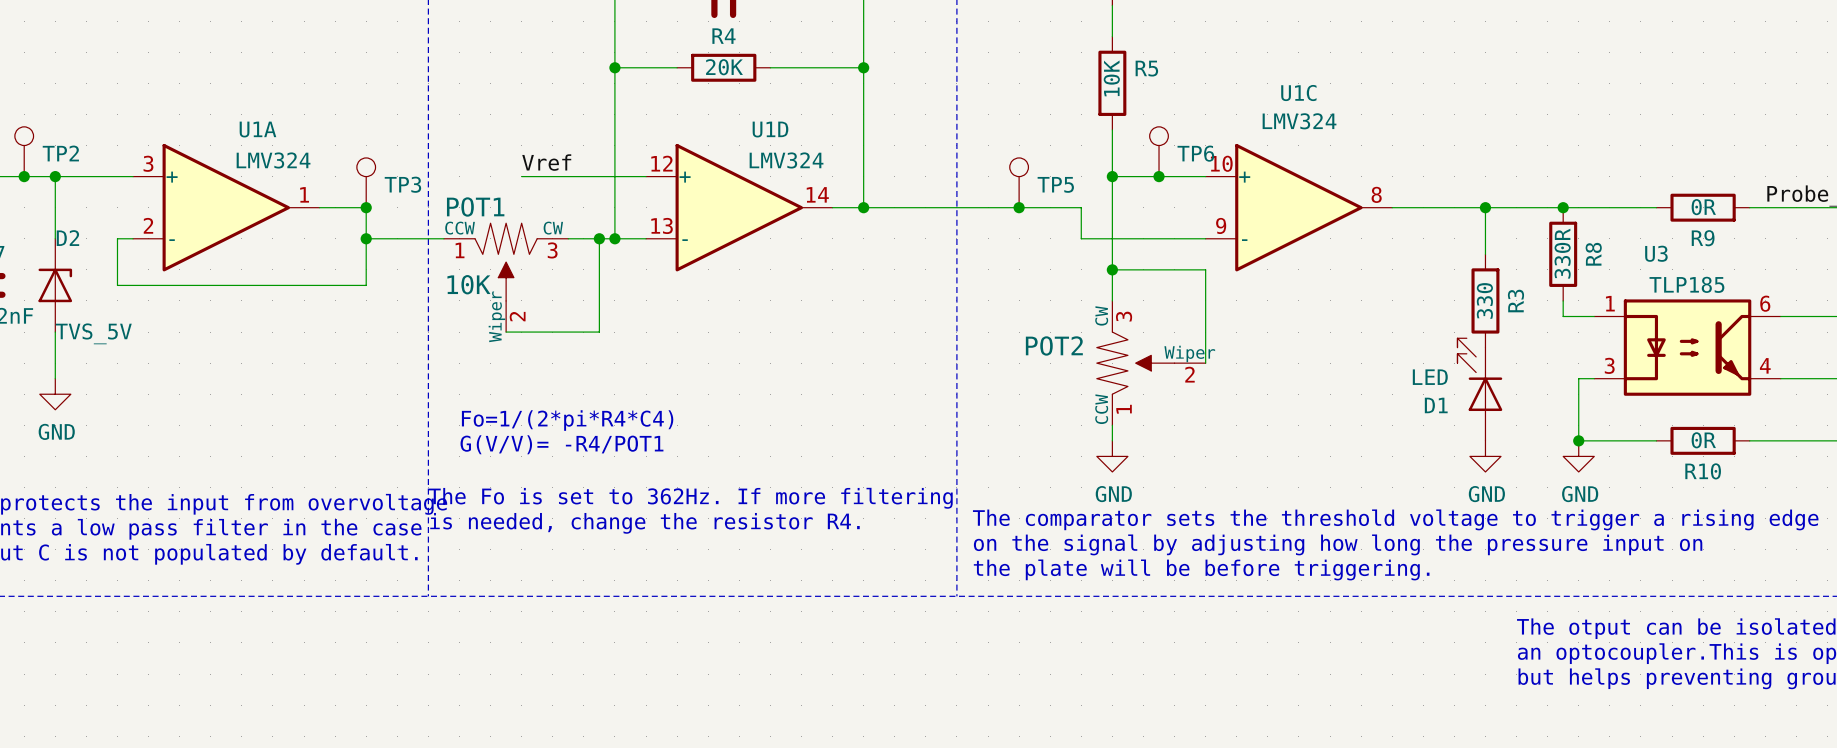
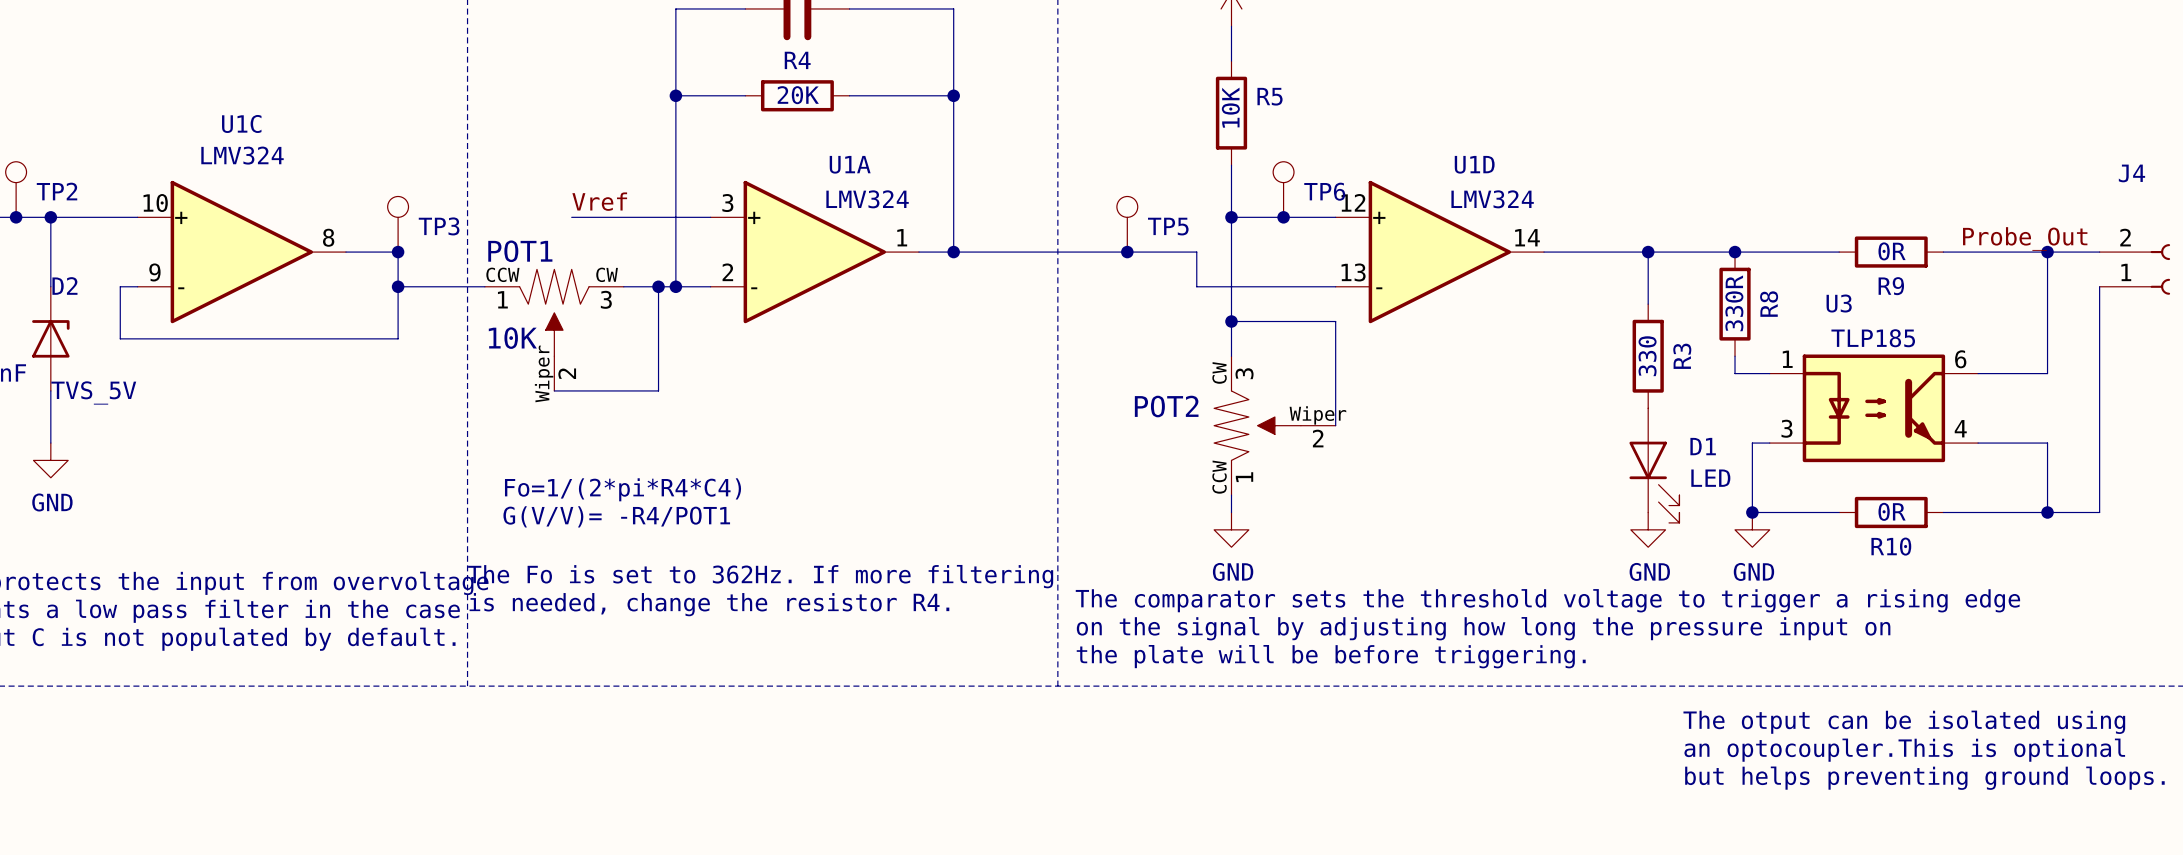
U1A position: (226, 207) -> (814, 252)
U1D position: (739, 207) -> (1439, 252)
U1C position: (1298, 207) -> (241, 252)
D1 rotation: 0° (1479, 374) -> 180° (1654, 482)

